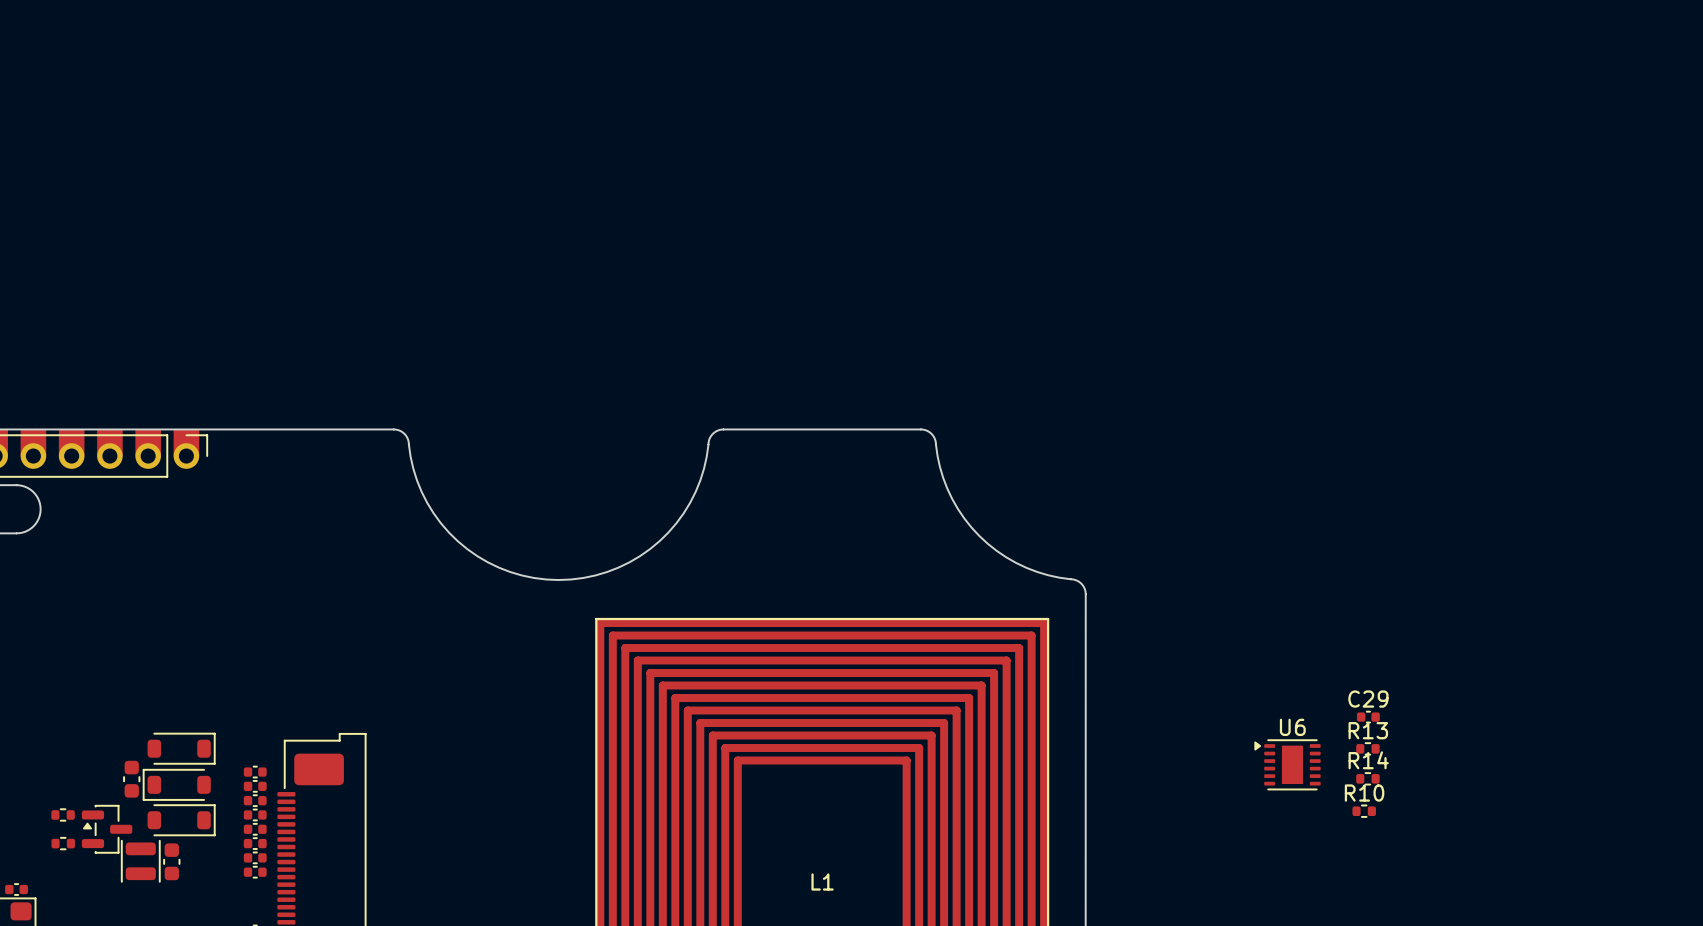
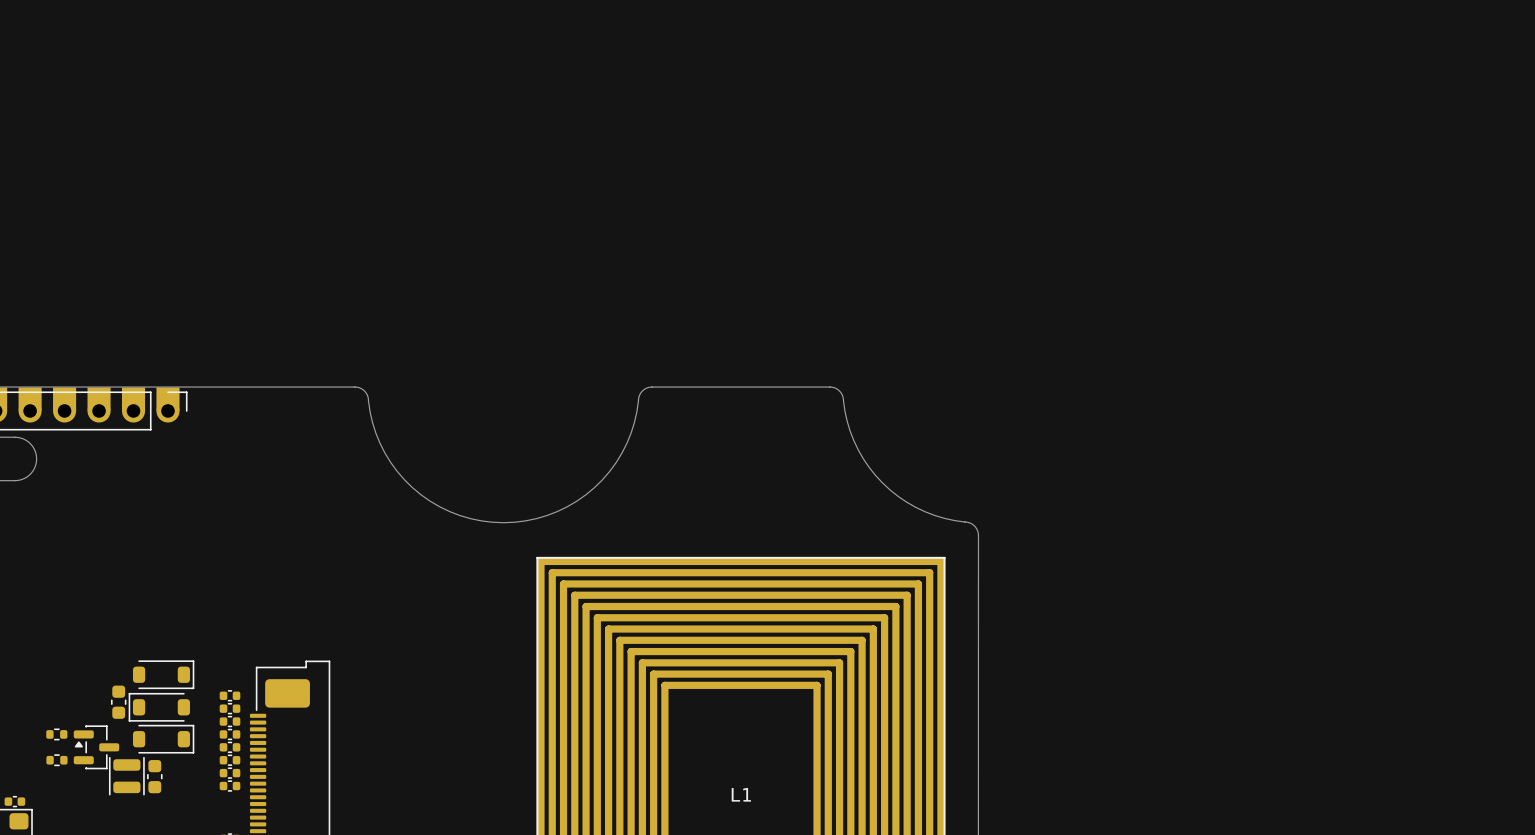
C29: (1368, 717) -> none
R13: (1367, 748) -> none
U6: (1287, 764) -> none
R14: (1367, 778) -> none
R10: (1364, 811) -> none

